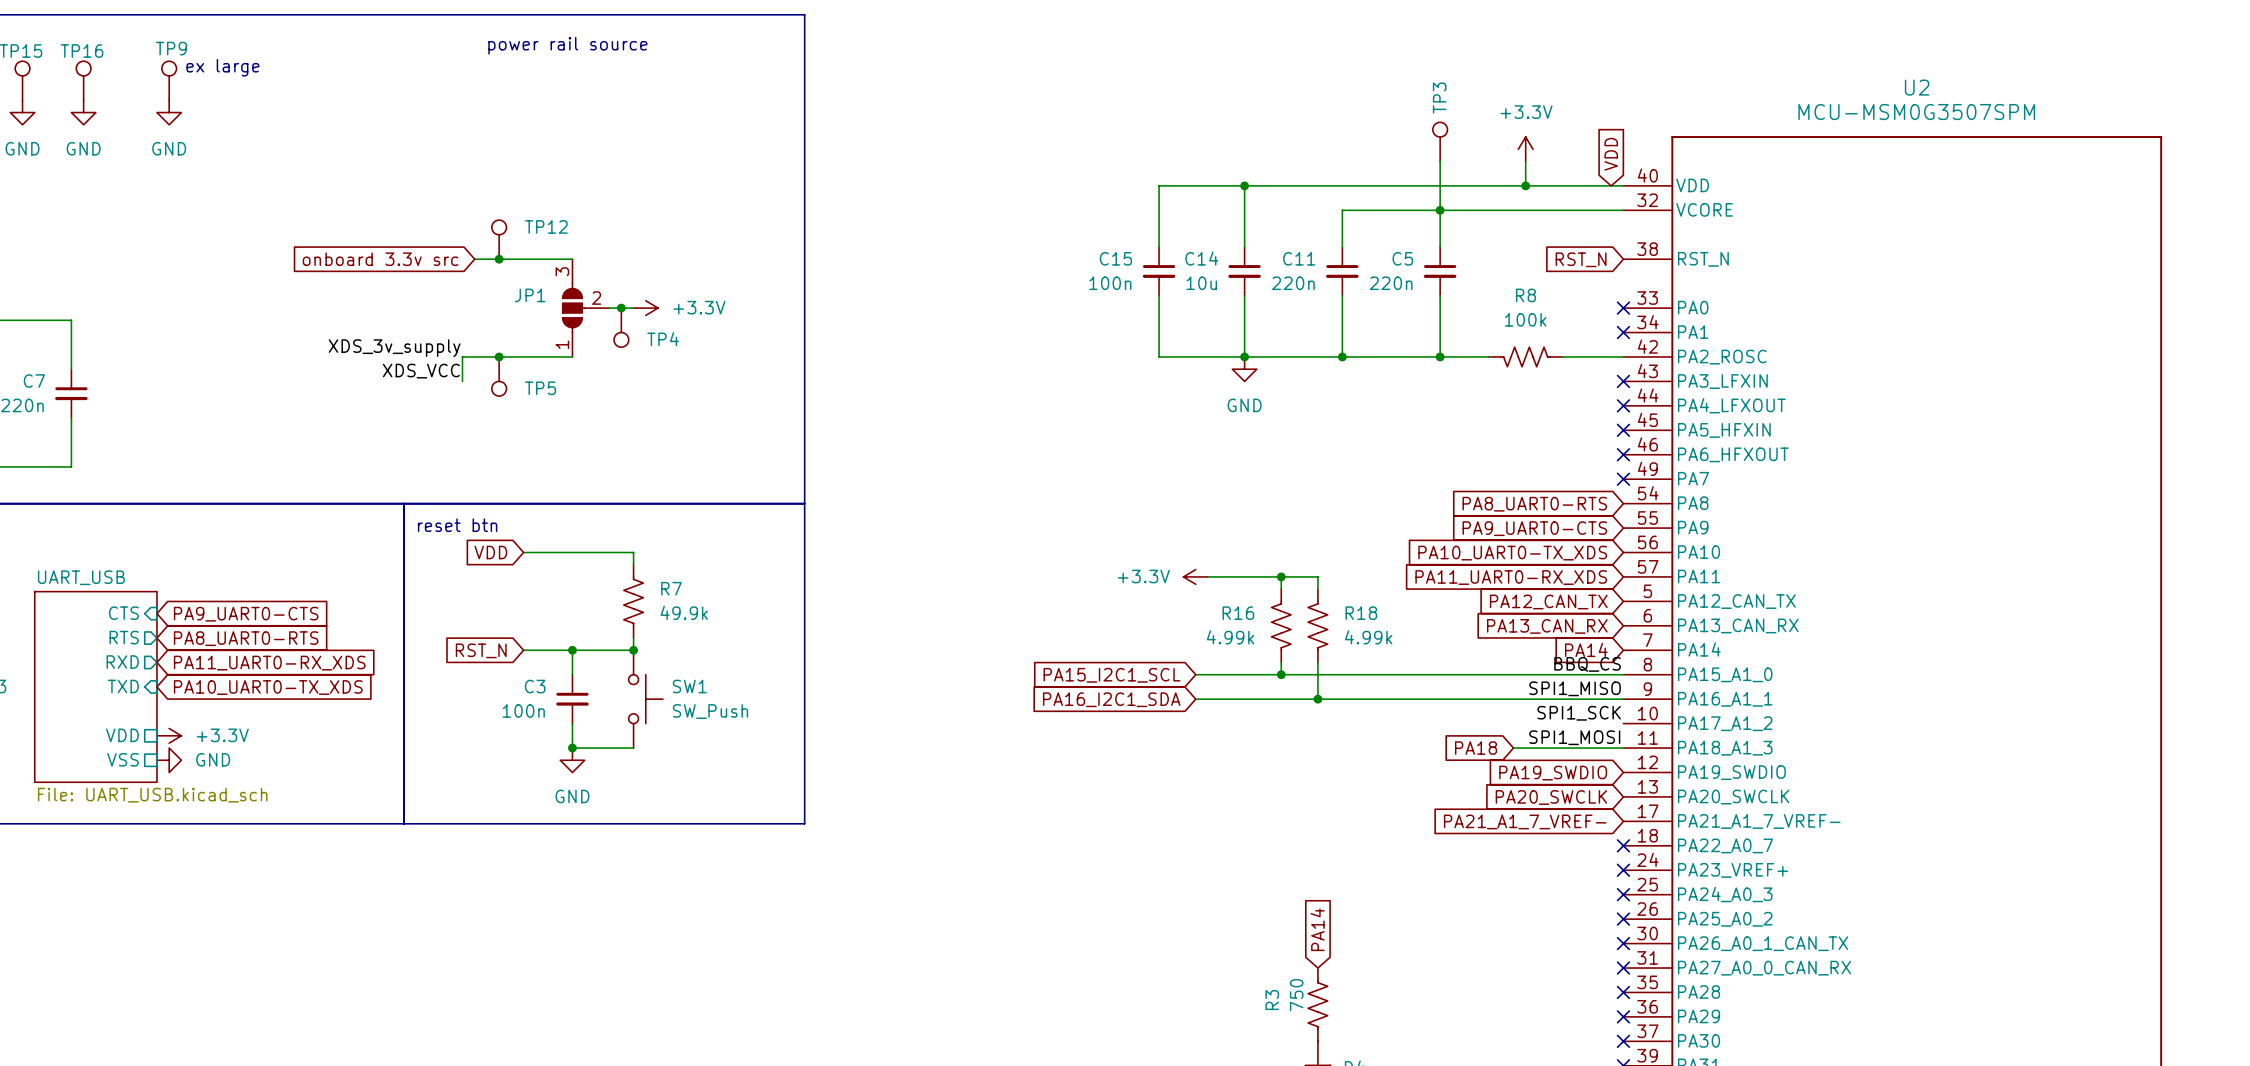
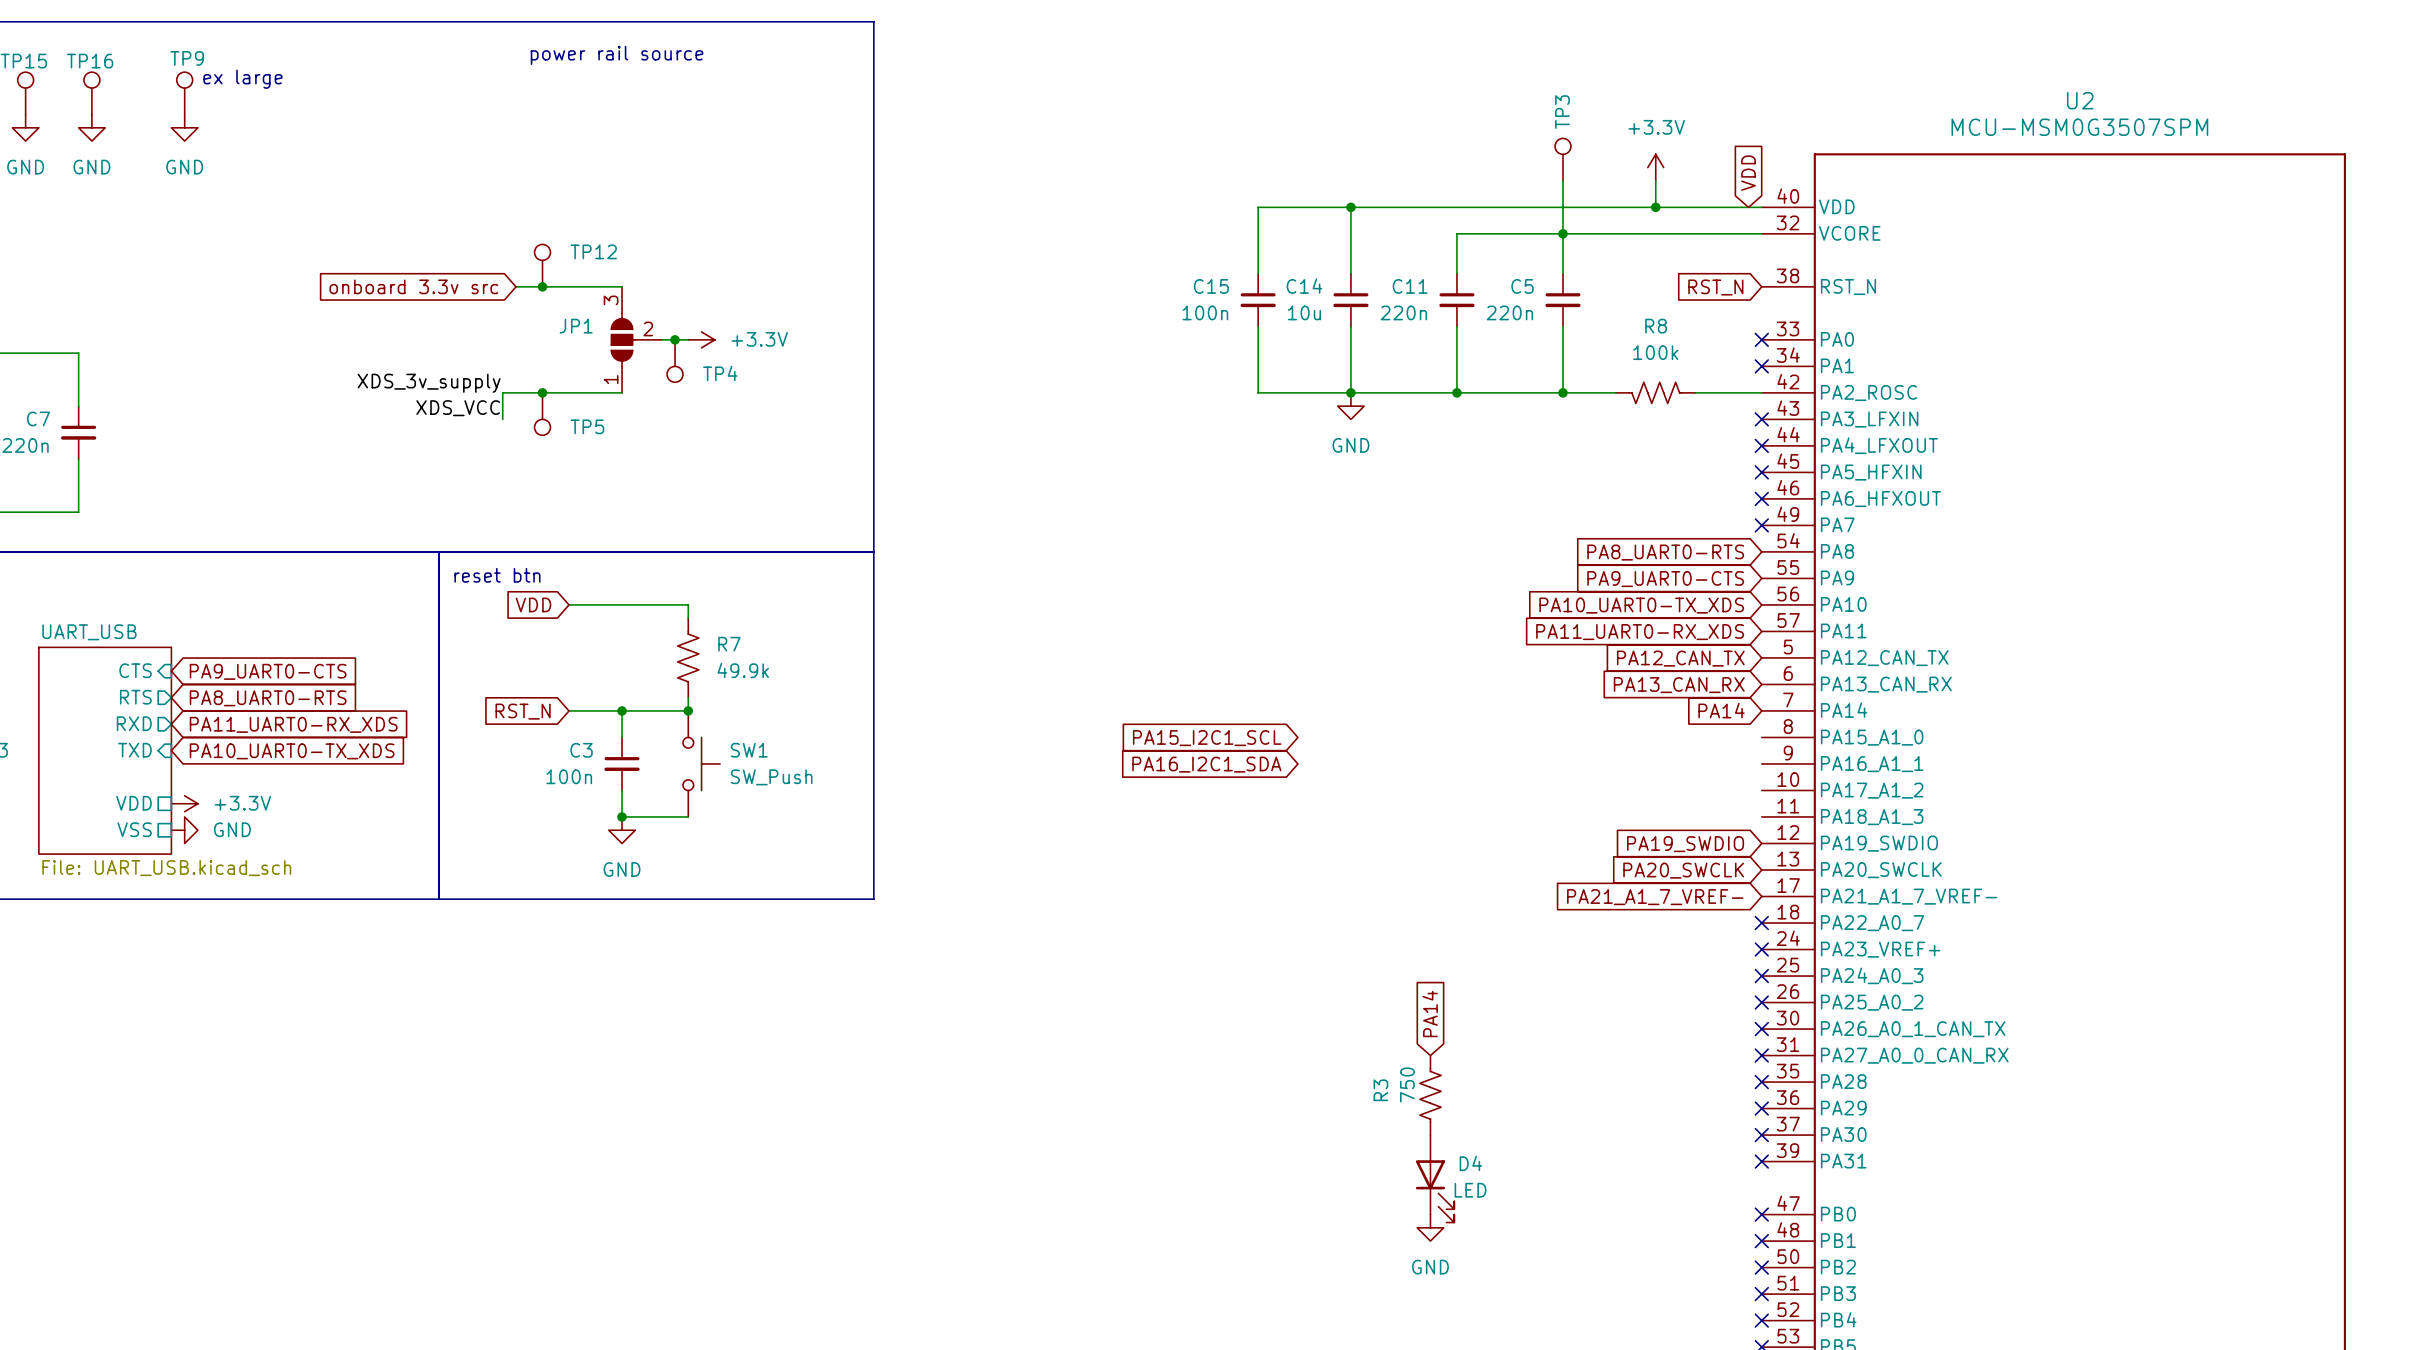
power symbol: +3.3V (1195, 576) -> none
wire: (1207, 576) (1317, 576) (1317, 589) -> none
wire: (1281, 576) (1281, 589) -> none
junction: (1281, 576) -> none
R16: 4.99k (1281, 625) -> none
R18: 4.99k (1317, 625) -> none
wire: (1281, 662) (1281, 674) -> none
wire: (1317, 662) (1317, 699) -> none
label: BBQ_CS (1587, 664) -> none
wire: (1195, 674) (1623, 674) -> none
junction: (1281, 674) -> none
label: SPI1_MISO (1575, 688) -> none
wire: (1195, 699) (1623, 699) -> none
junction: (1317, 699) -> none
label: SPI1_SCK (1579, 713) -> none
label: SPI1_MOSI (1574, 737) -> none
global label: PA18 (1476, 748) -> none
wire: (1513, 748) (1623, 748) -> none

